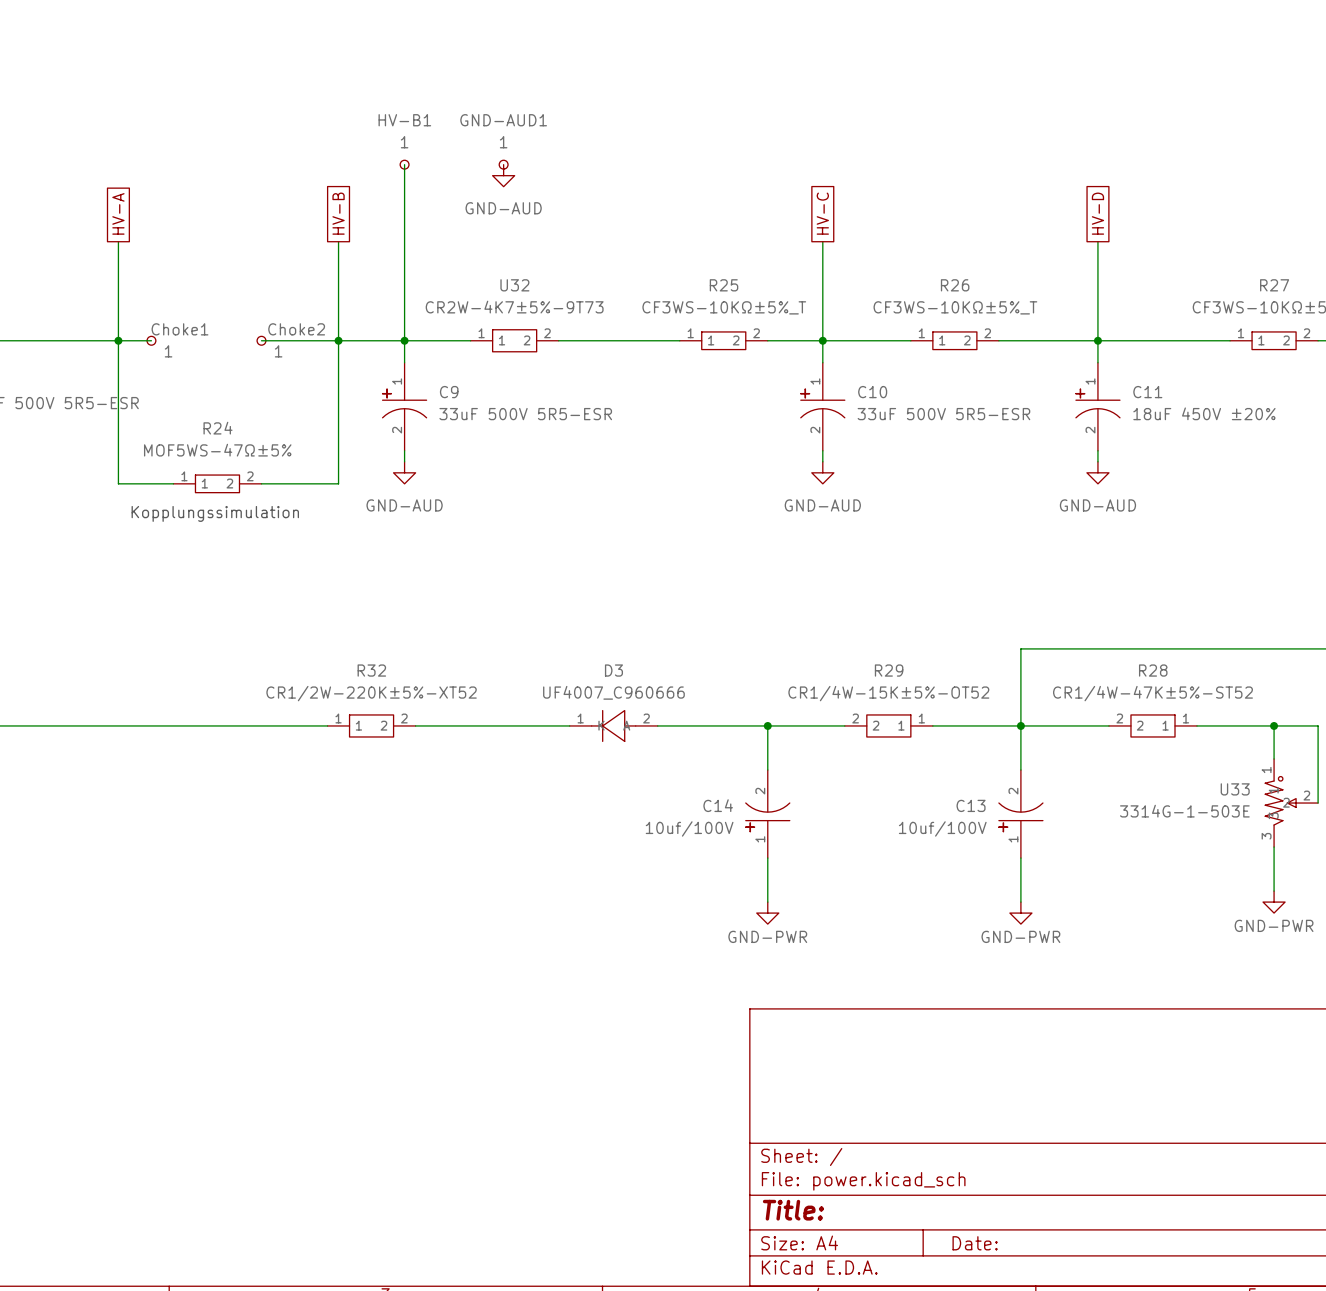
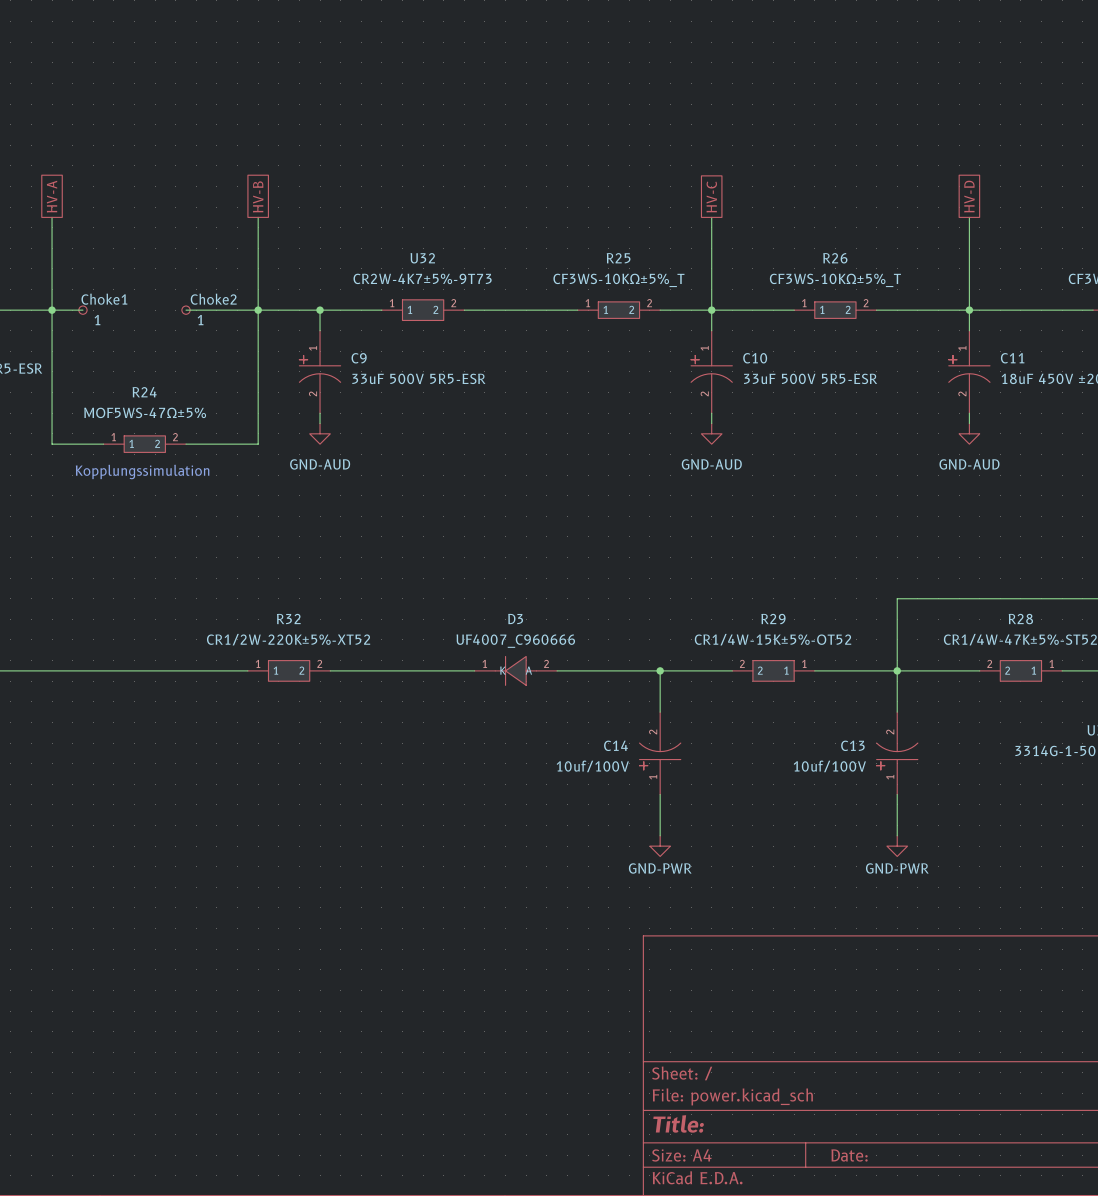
wire: (404, 164) (404, 340) -> none
HV-B1: 1 (404, 164) -> none
GND-AUD1: 1 (503, 164) -> none
power symbol: GND-AUD (503, 175) -> none

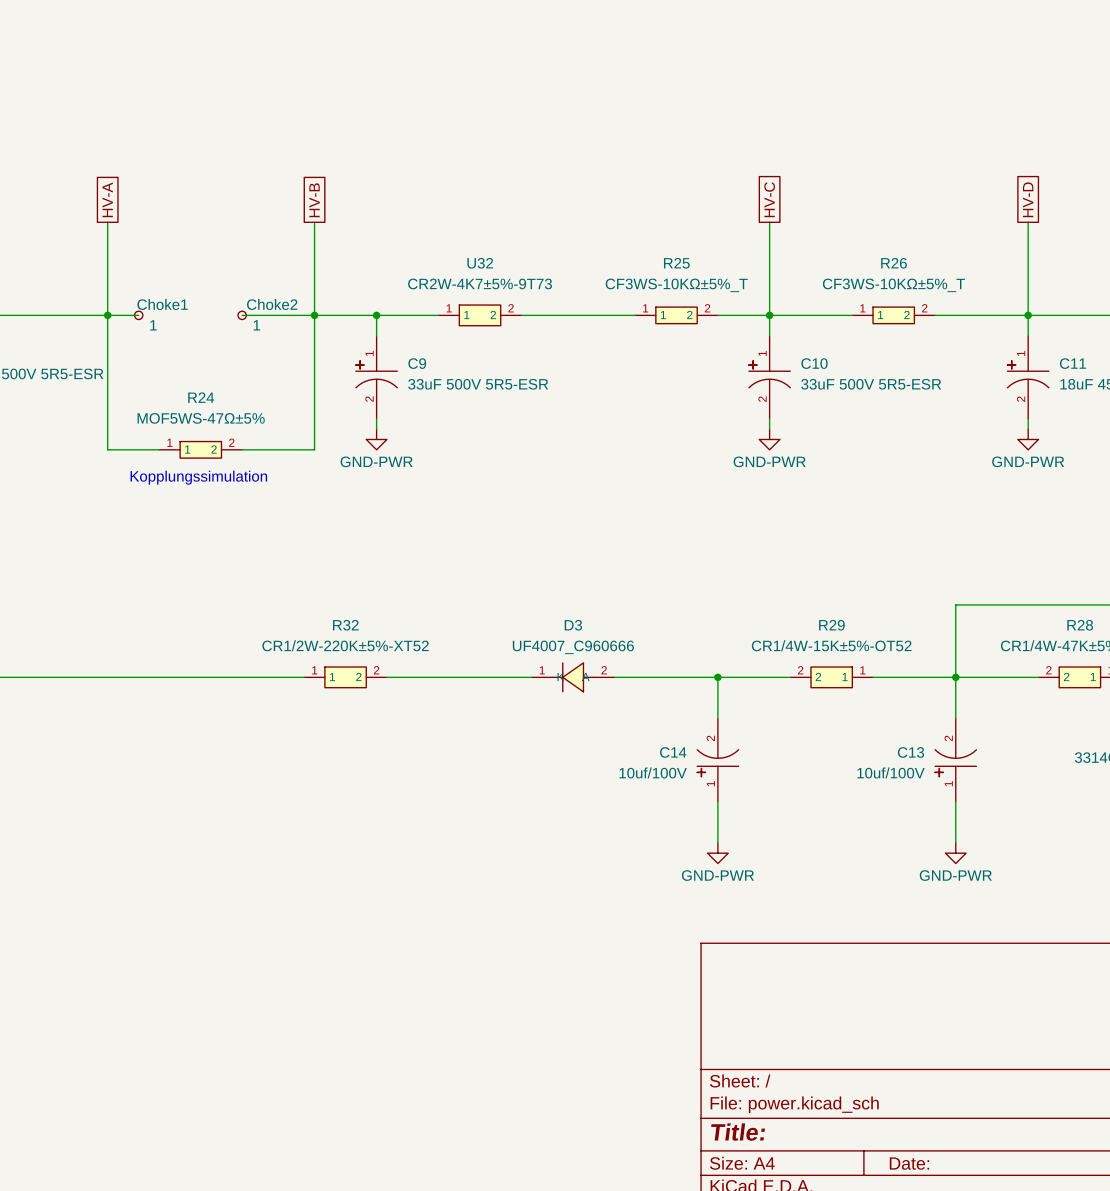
power symbol: GND-AUD (320, 433) -> GND-PWR (376, 439)
power symbol: GND-AUD (711, 433) -> GND-PWR (769, 439)
power symbol: GND-AUD (969, 433) -> GND-PWR (1028, 439)

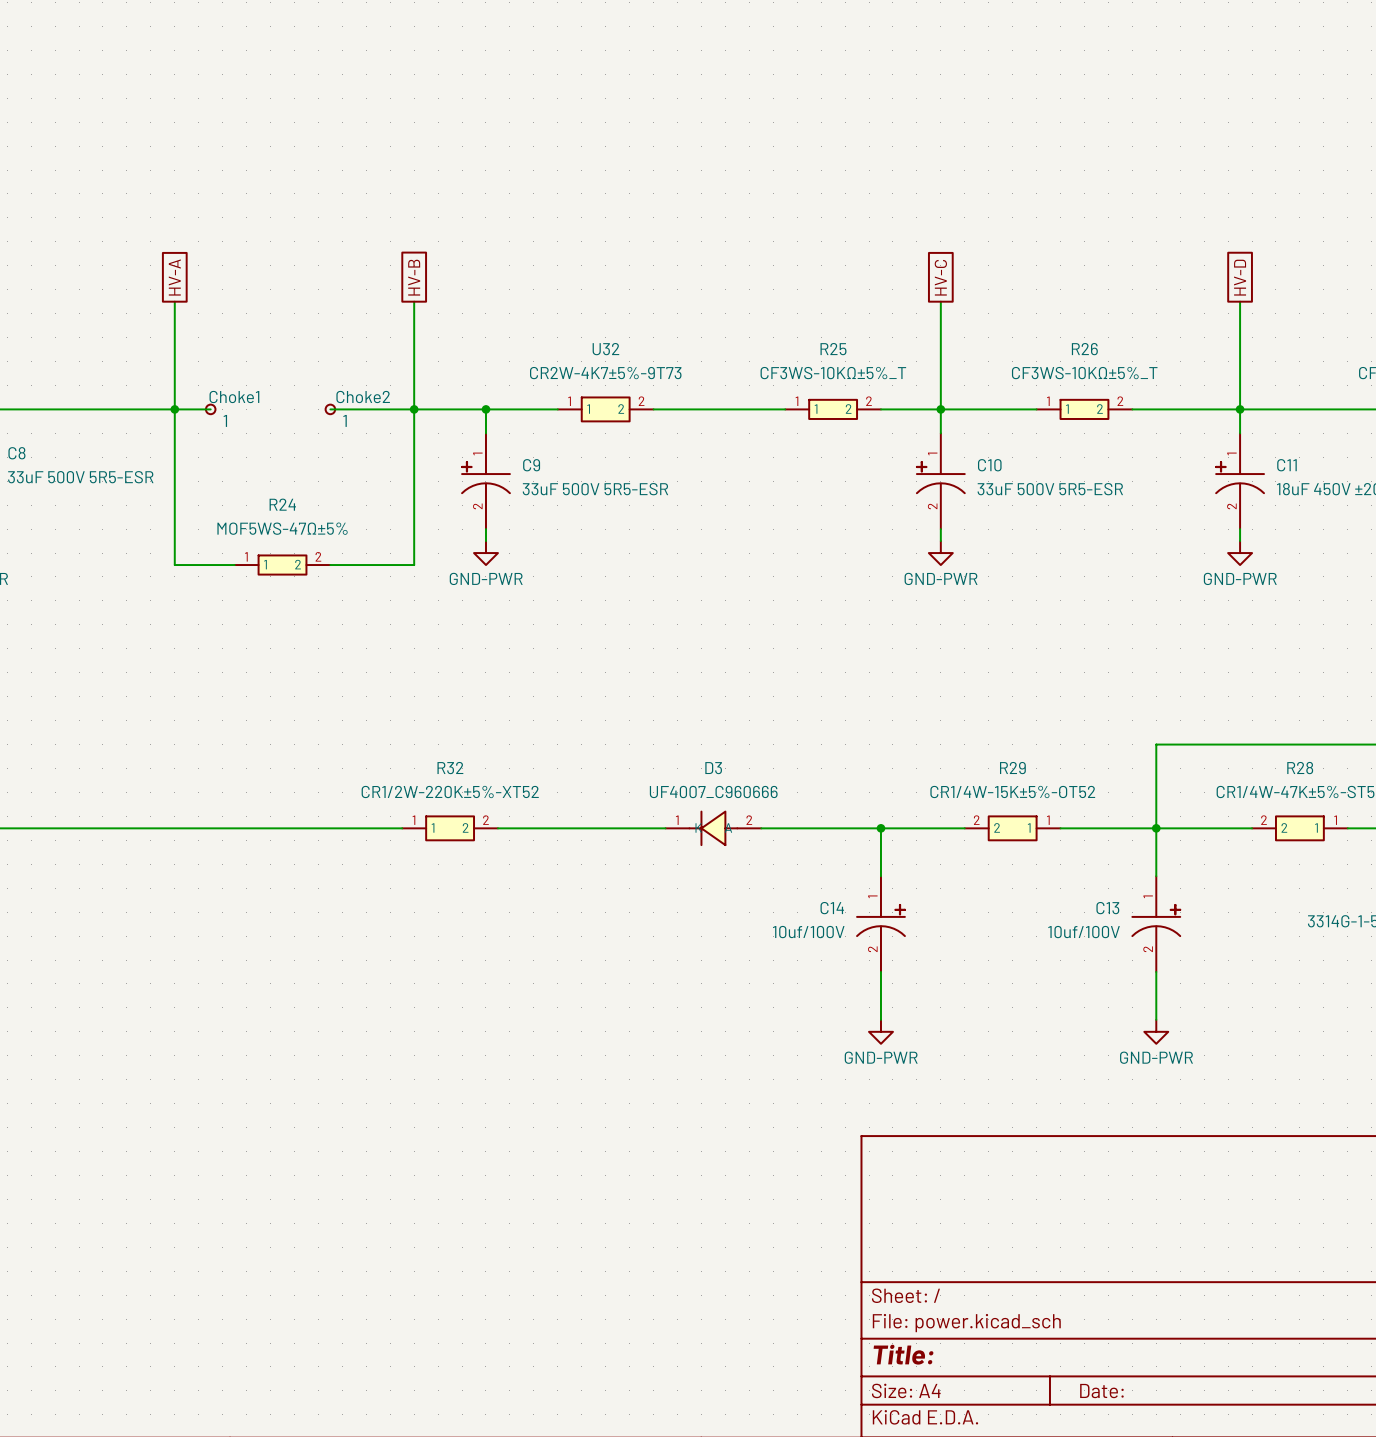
text: Kopplungssimulation (198, 477) -> none
C14 rotation: 0° (717, 763) -> 180° (880, 920)
C13 rotation: 0° (955, 763) -> 180° (1156, 920)

